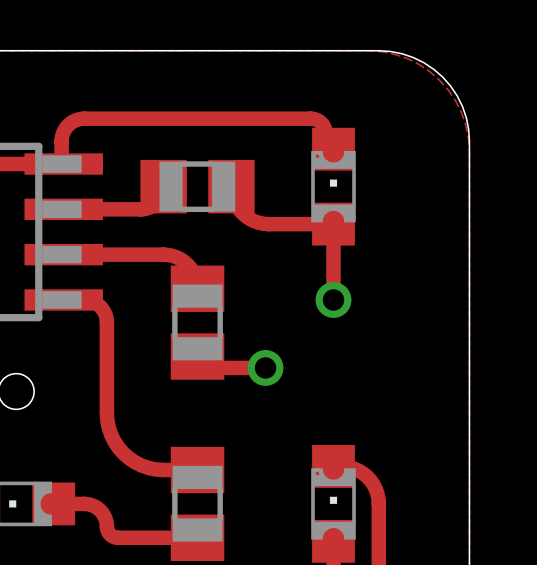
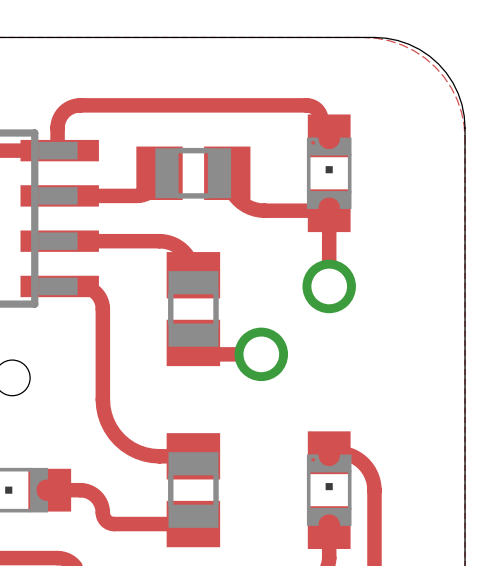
via size: [315, 282, 352, 318] -> [302, 259, 356, 314]
via size: [247, 350, 284, 386] -> [234, 327, 289, 382]

